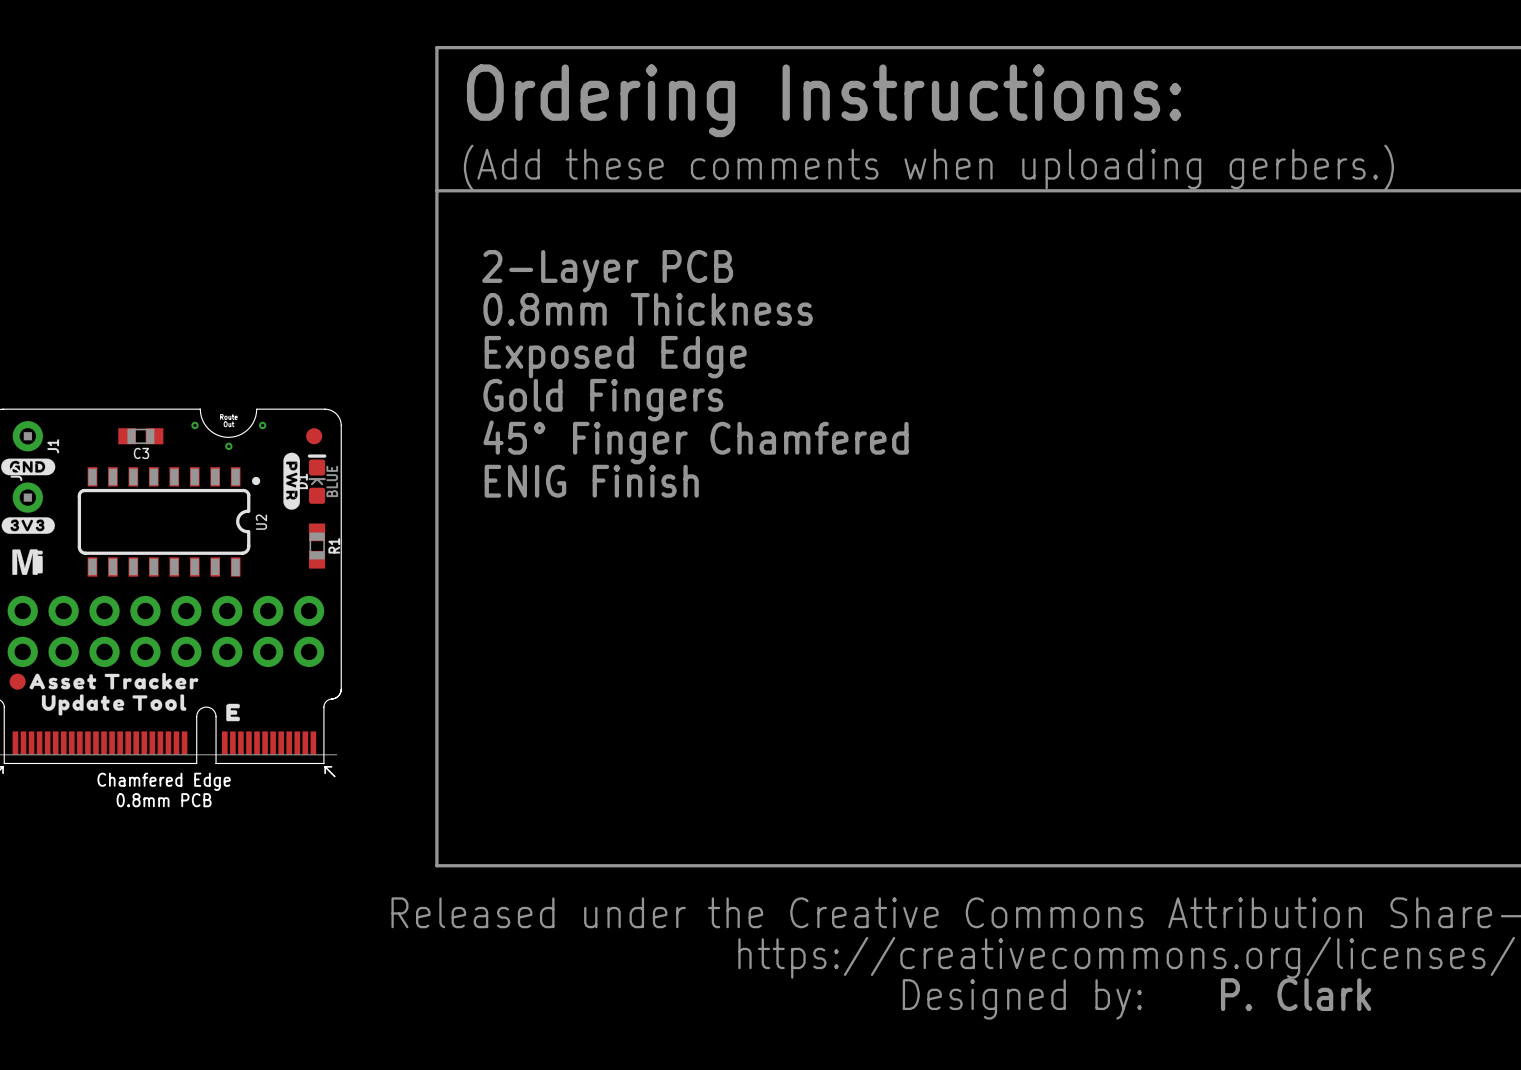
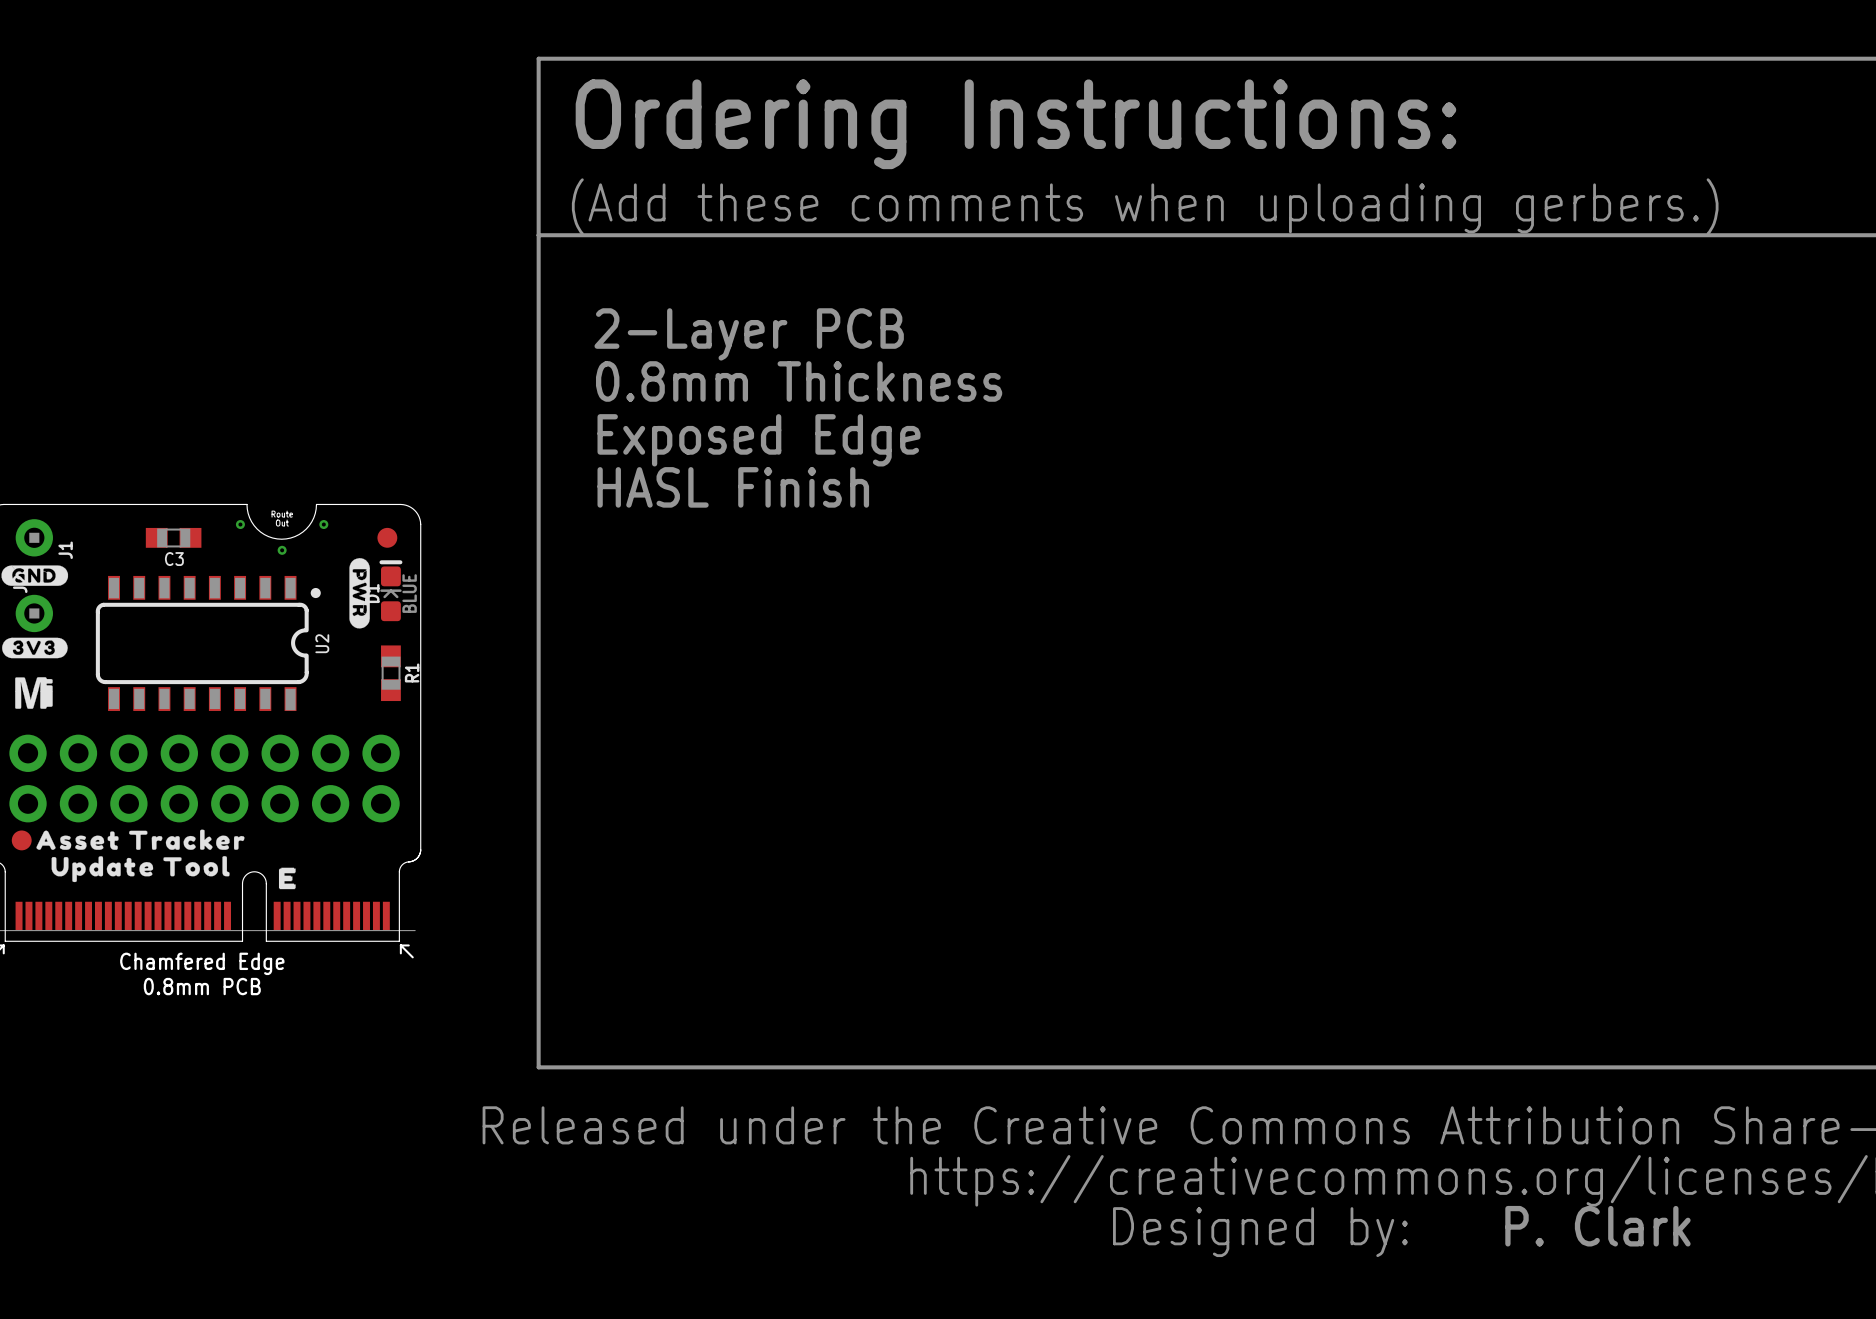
text: Gold Fingers (603, 400) -> HASL Finish (733, 487)
text: 45° Finger Chamfered (696, 442) -> none
text: ENIG Finish (591, 481) -> none

